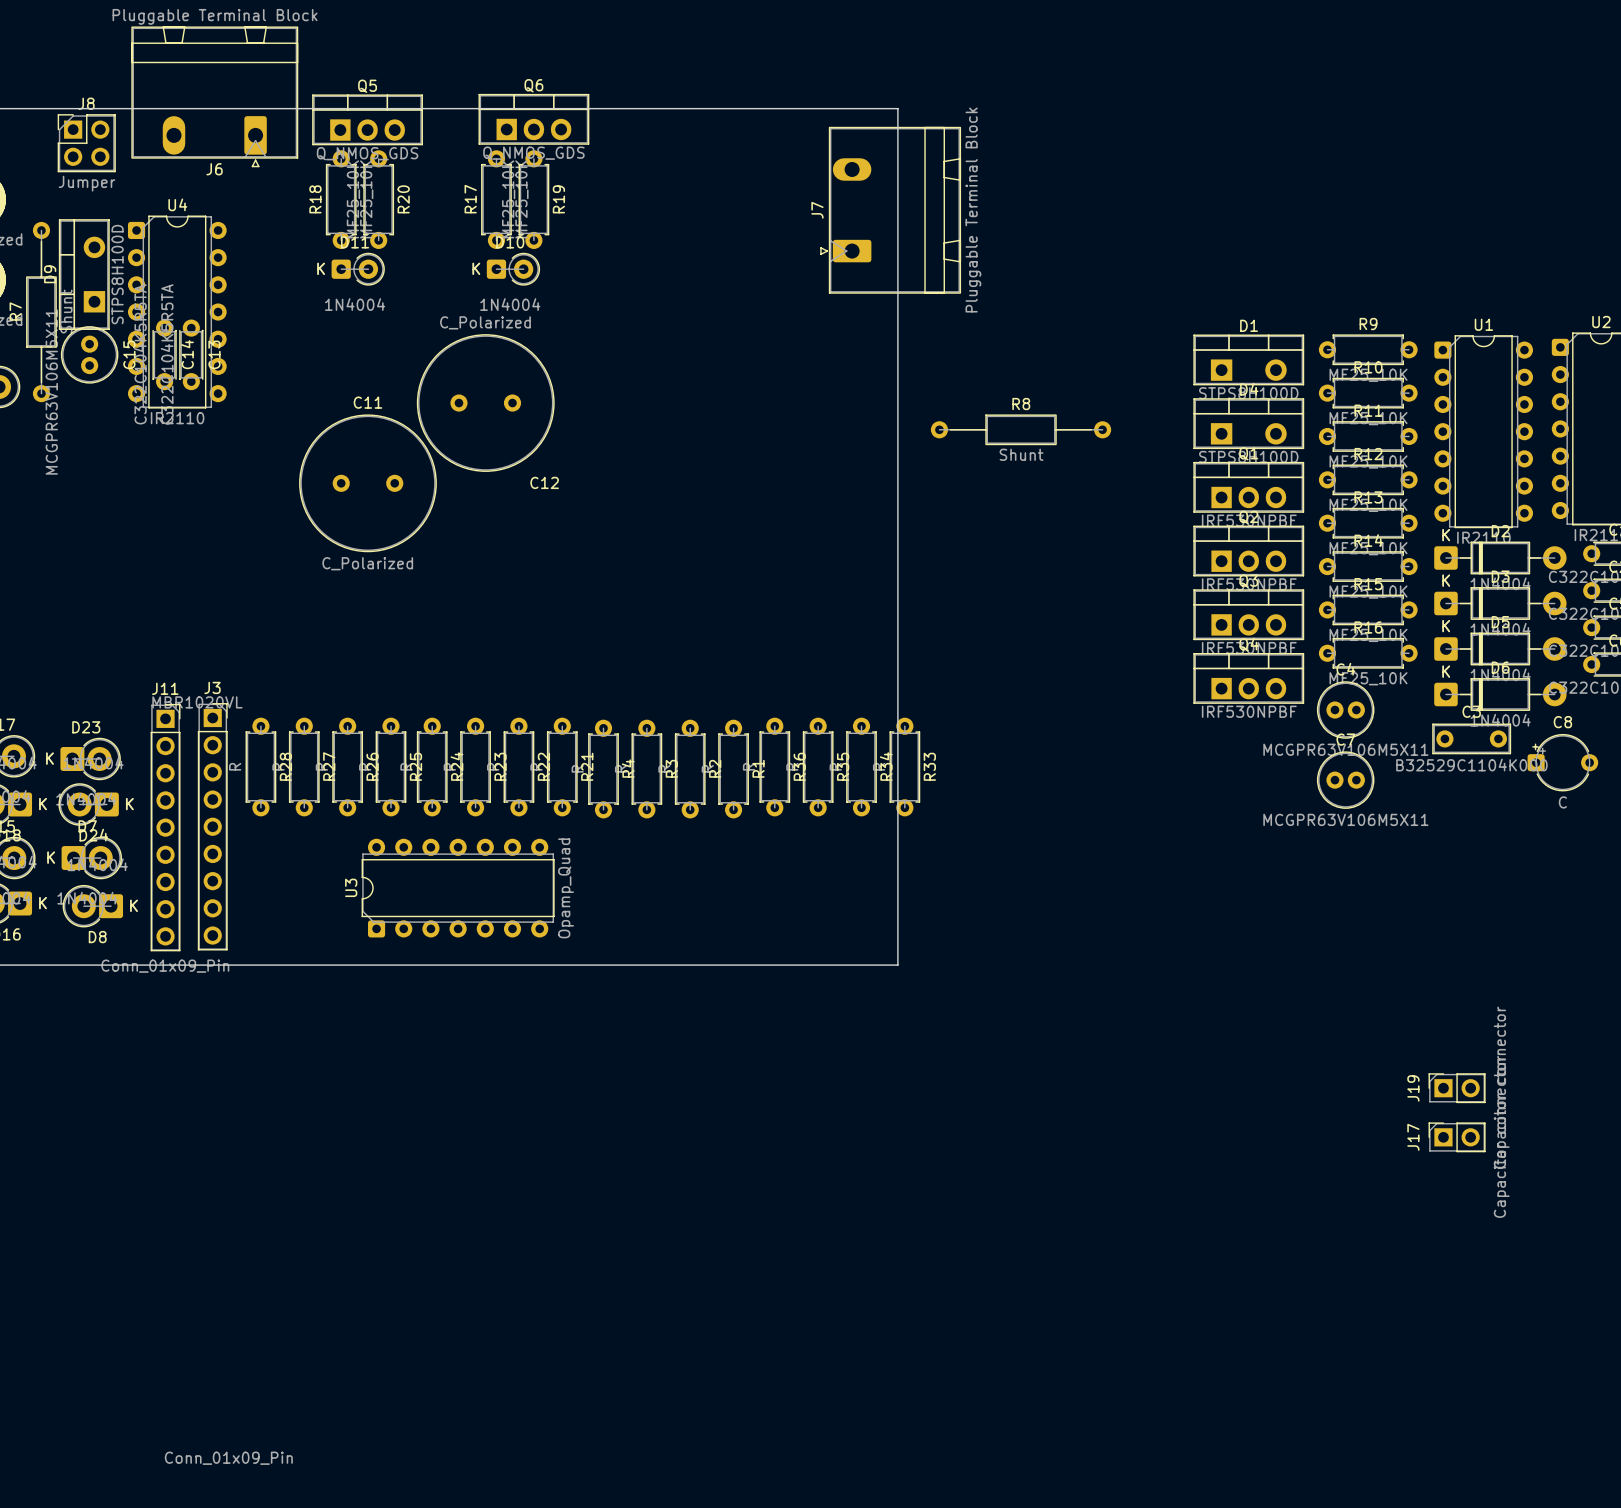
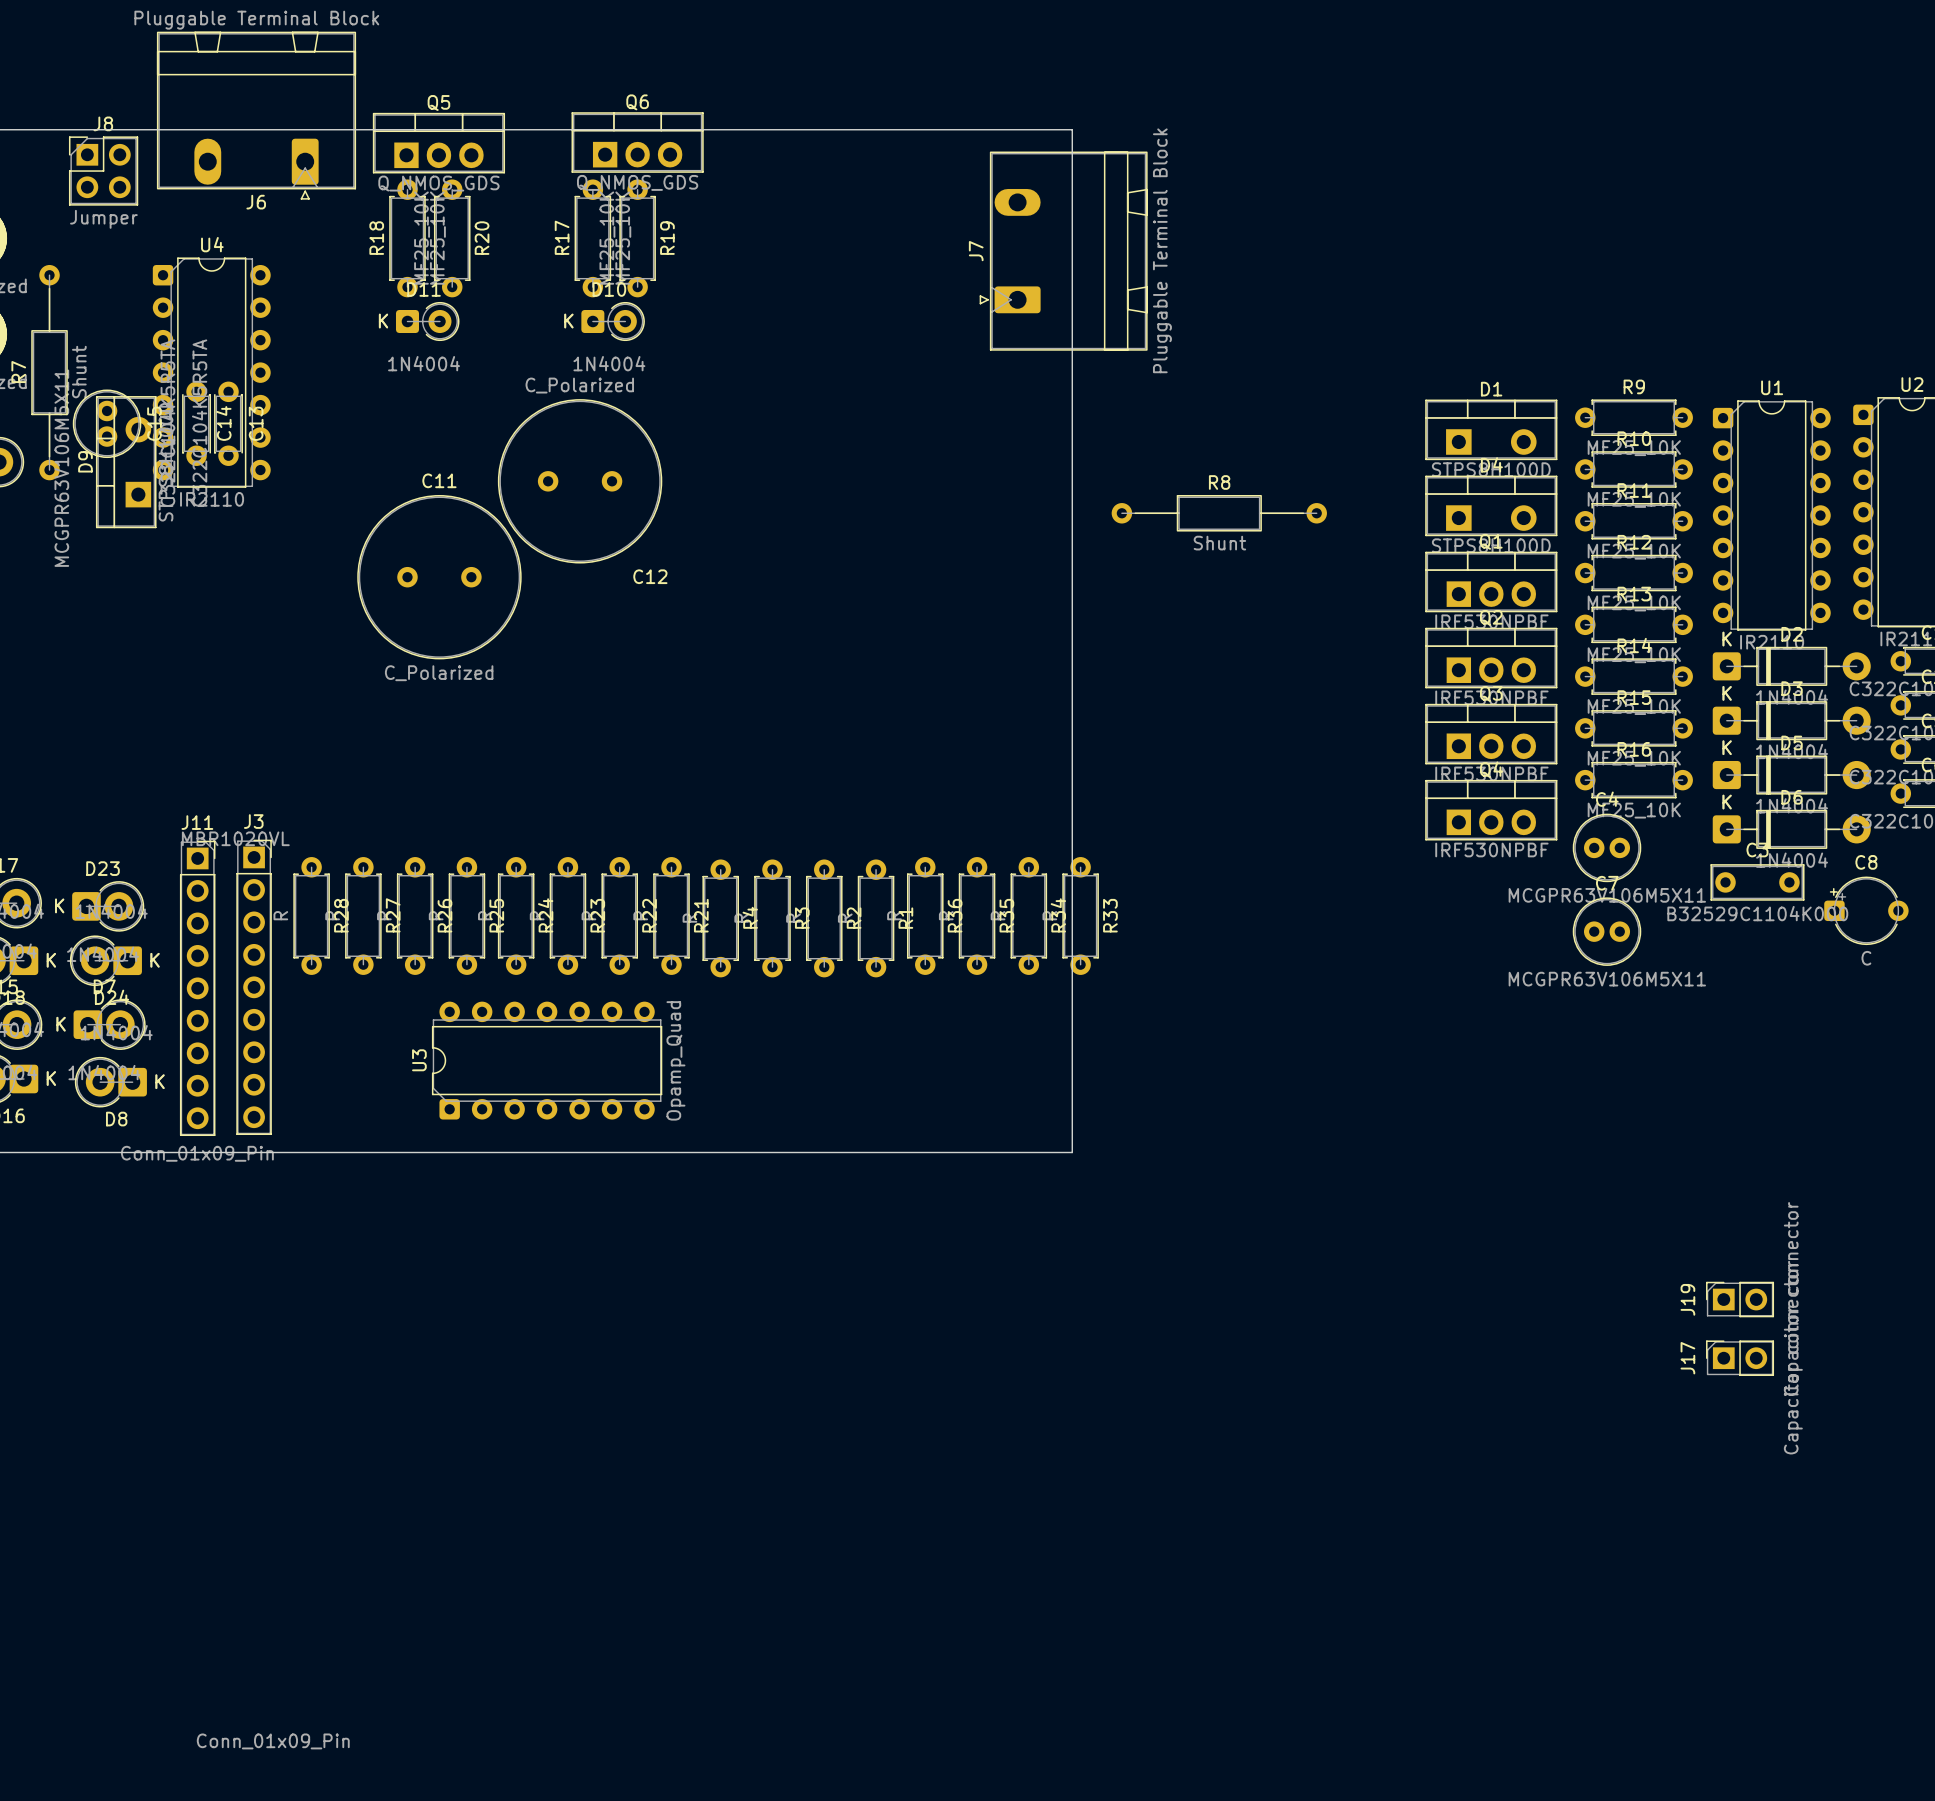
D9 position: (84, 274) -> (126, 462)

